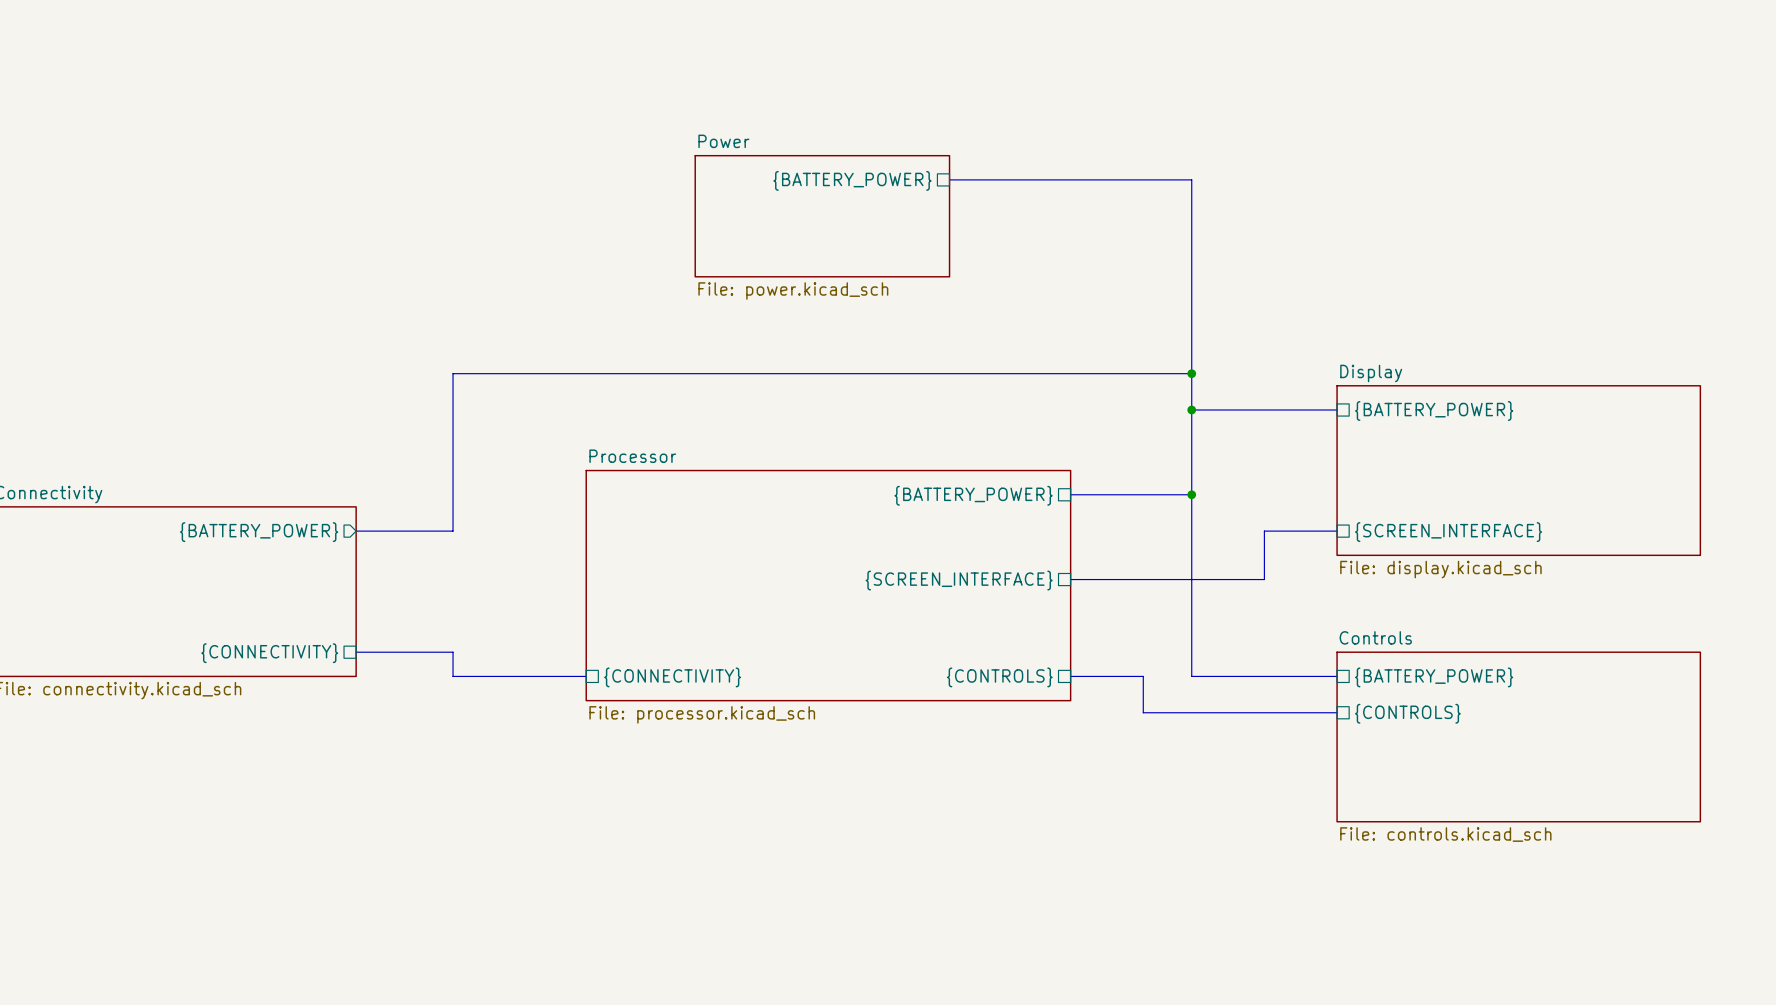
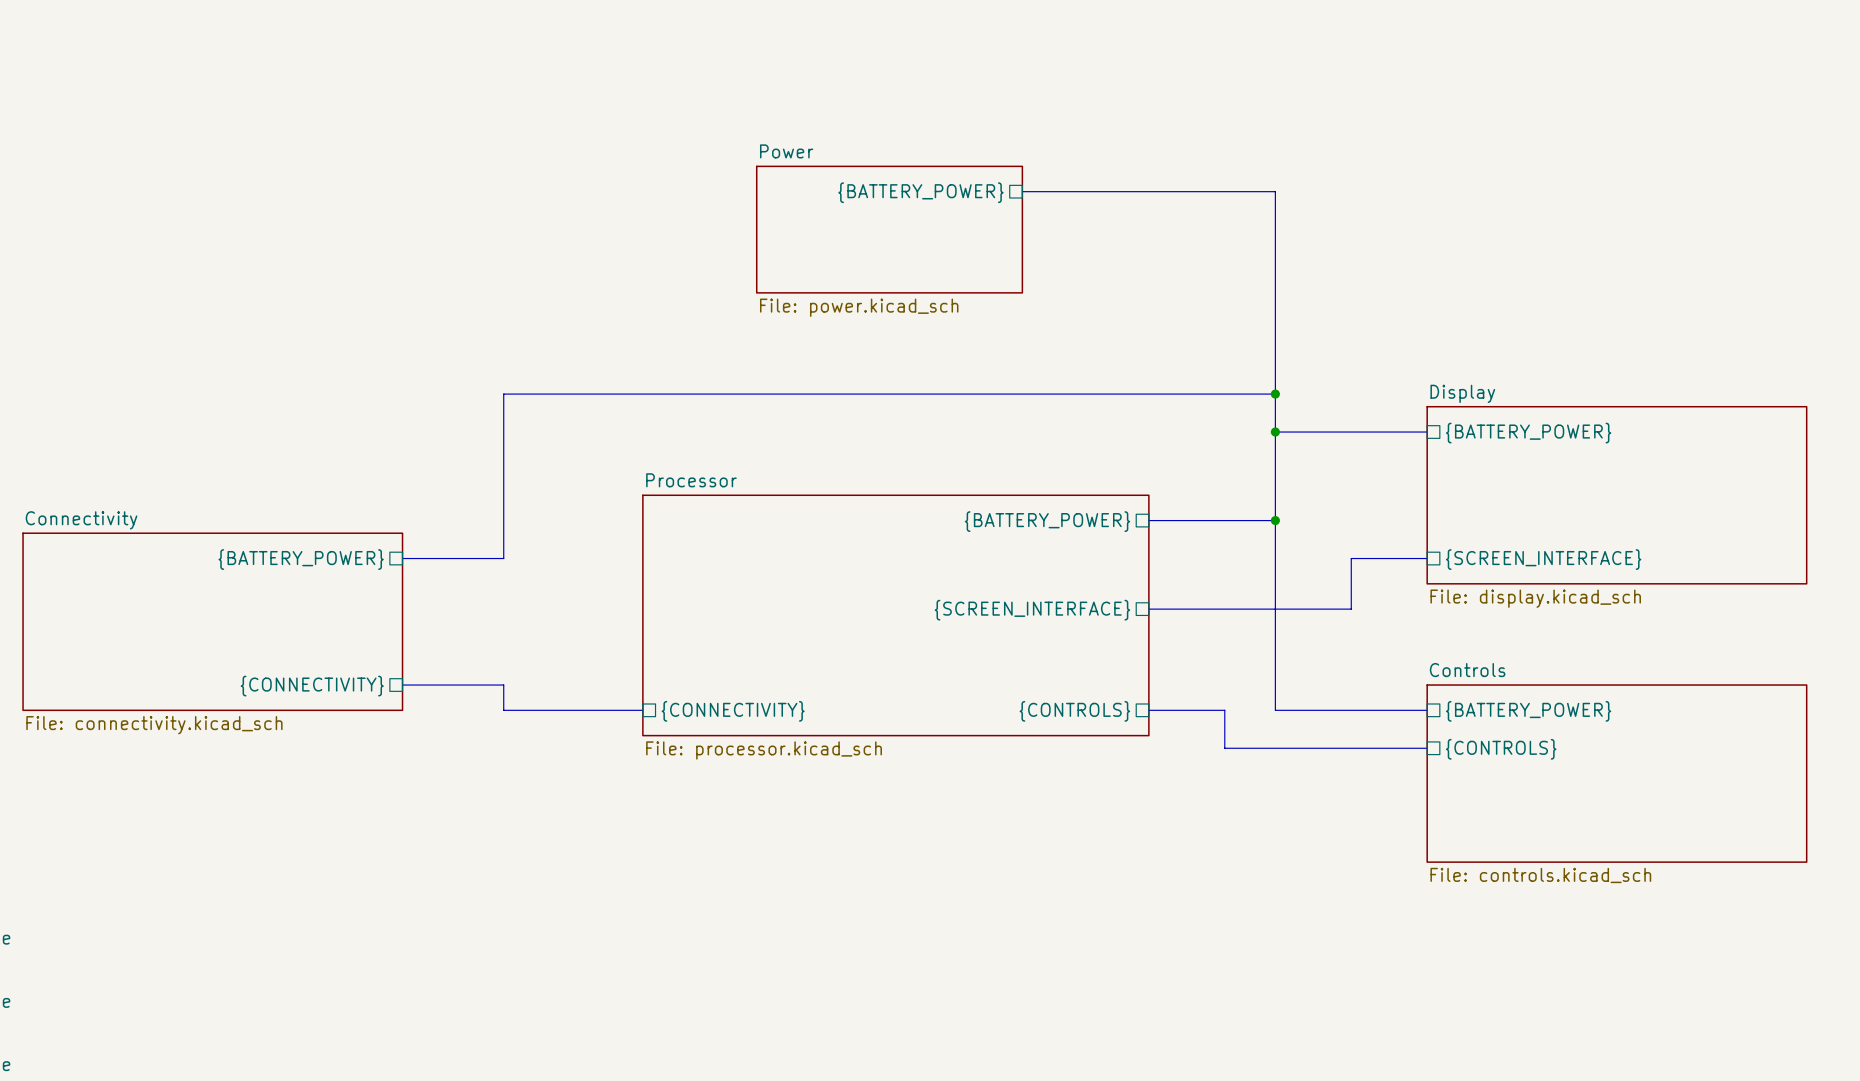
sheet pin shape: output (259, 532) -> passive (301, 559)

